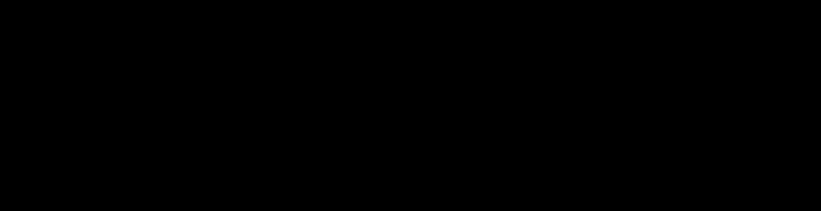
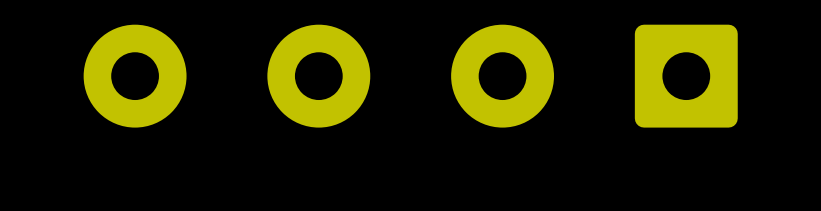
part: none -> (410, 76)

